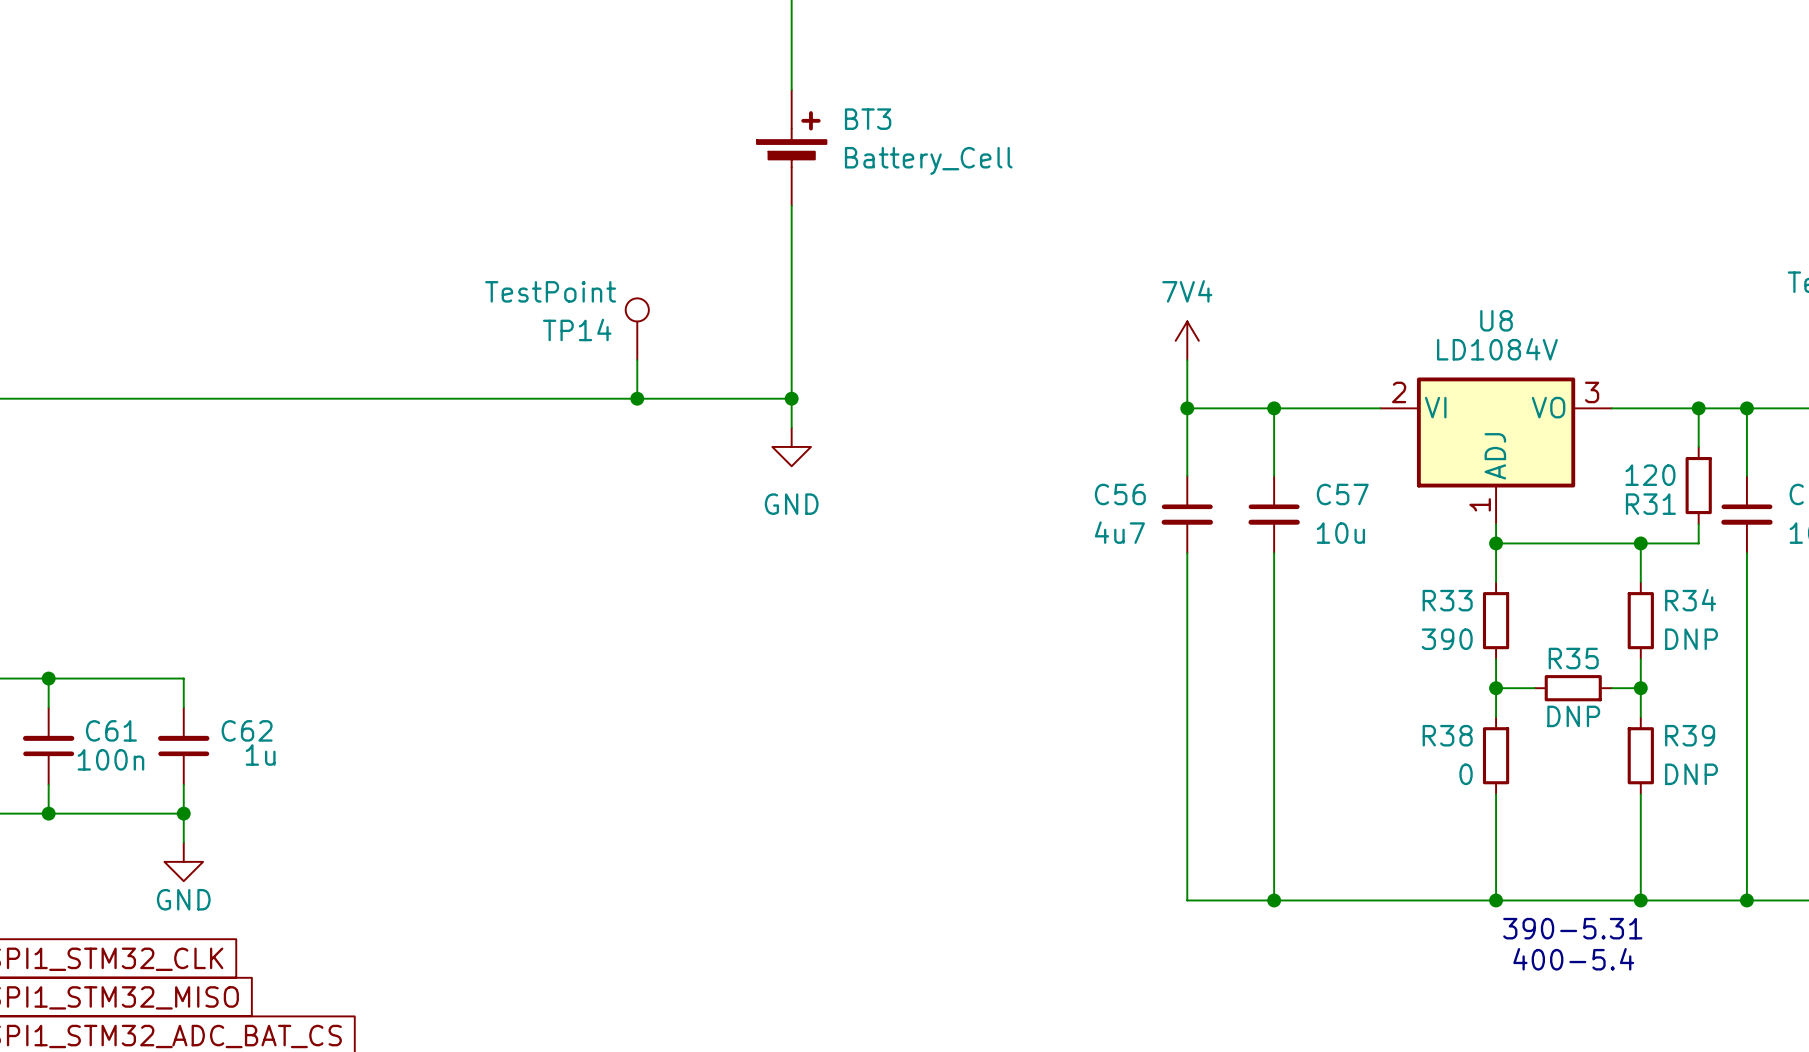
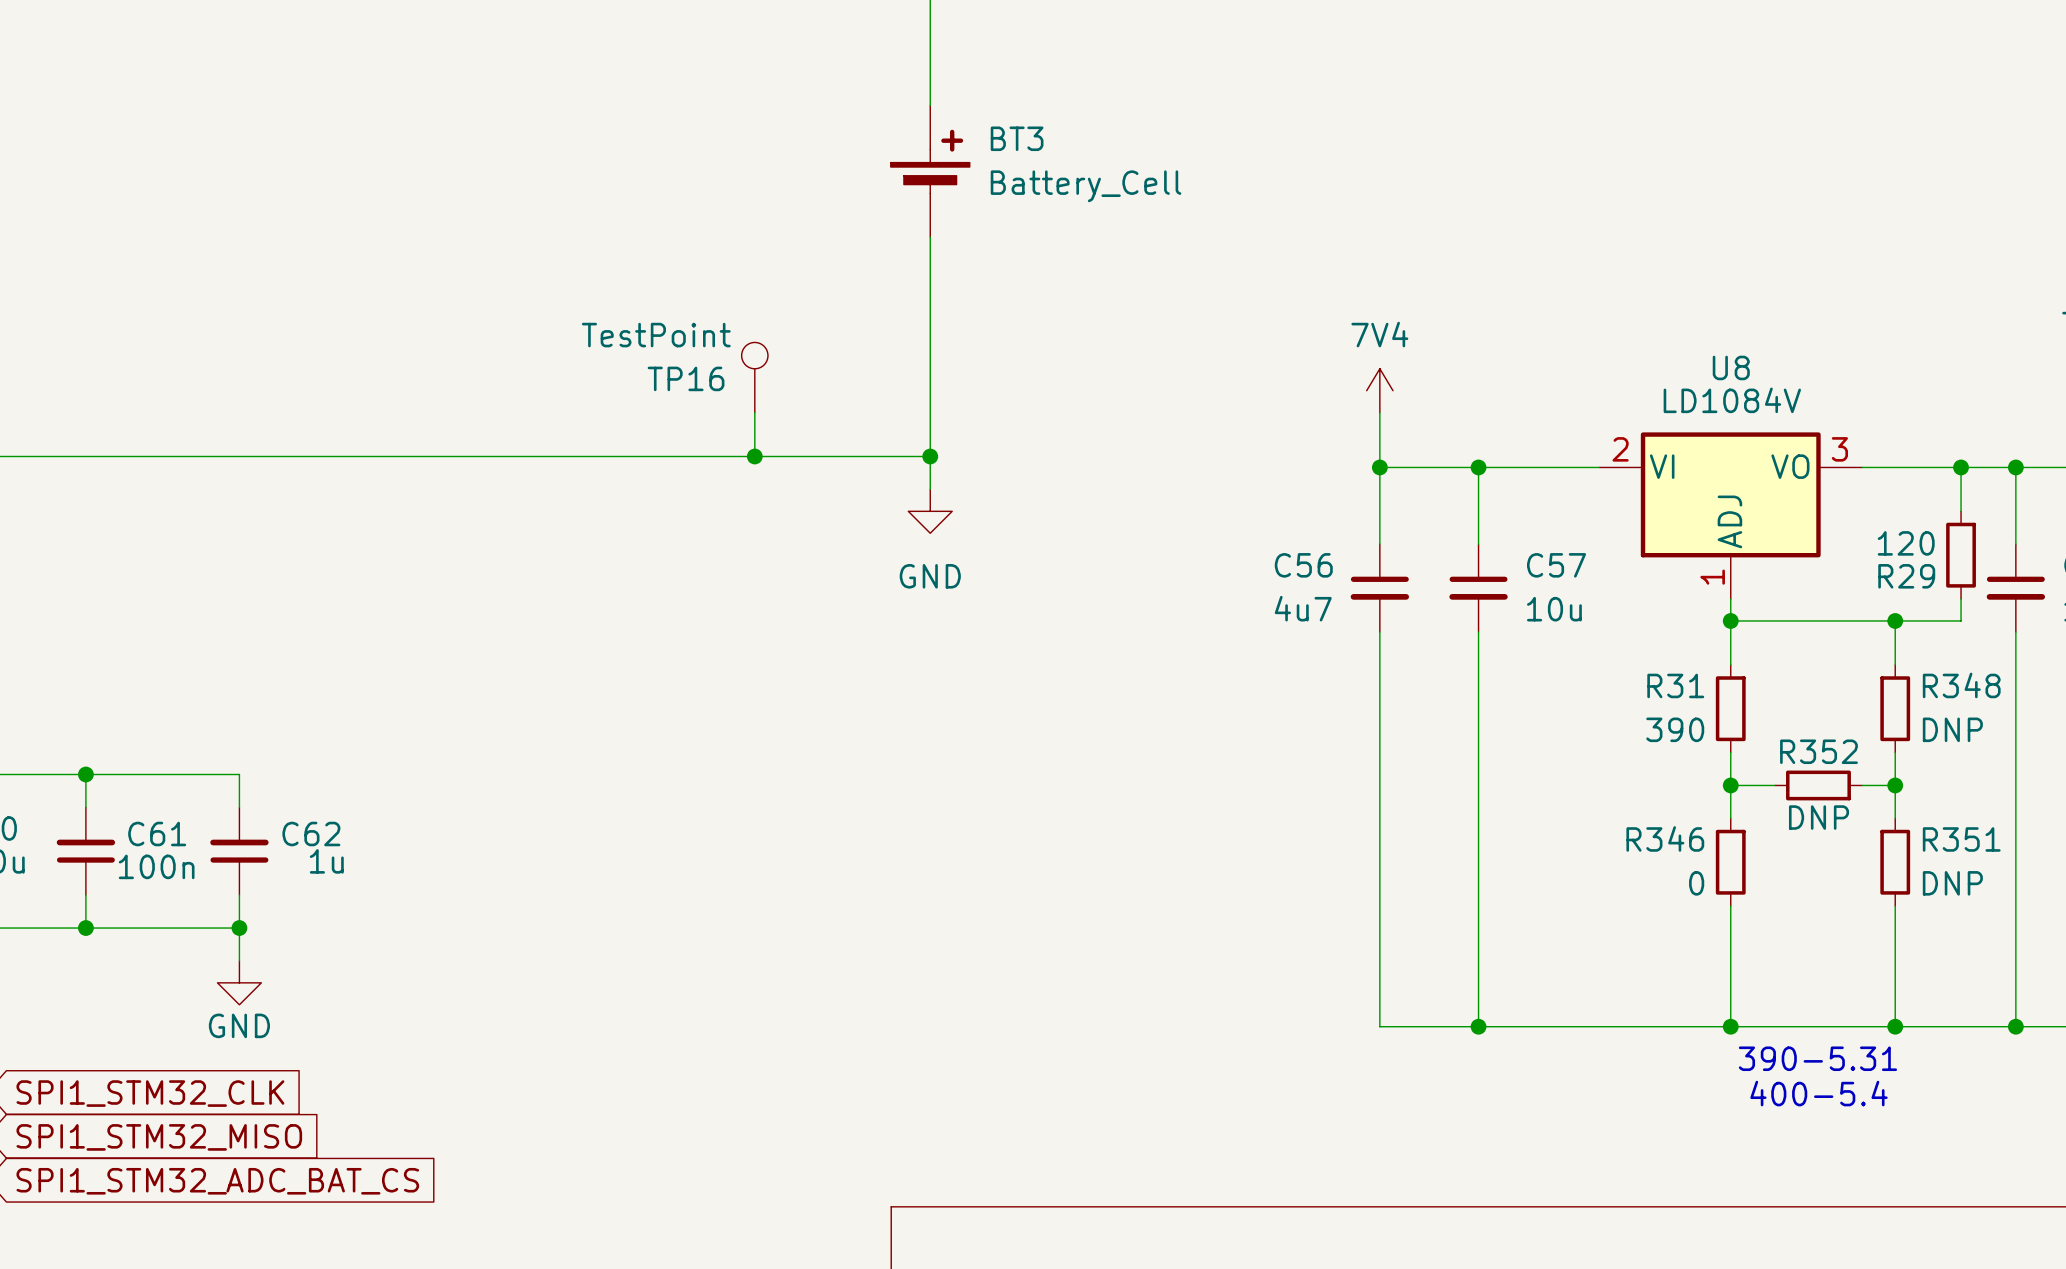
TP14 name: TP14 (577, 329) -> TP16 (686, 378)
R31 name: R31 (1650, 504) -> R29 (1906, 576)
R33 name: R33 (1447, 600) -> R31 (1675, 685)
R34 name: R34 (1690, 600) -> R348 (1961, 685)
R35 name: R35 (1573, 658) -> R352 (1819, 751)
R38 name: R38 (1447, 735) -> R346 (1665, 838)
R39 name: R39 (1690, 735) -> R351 (1961, 839)

